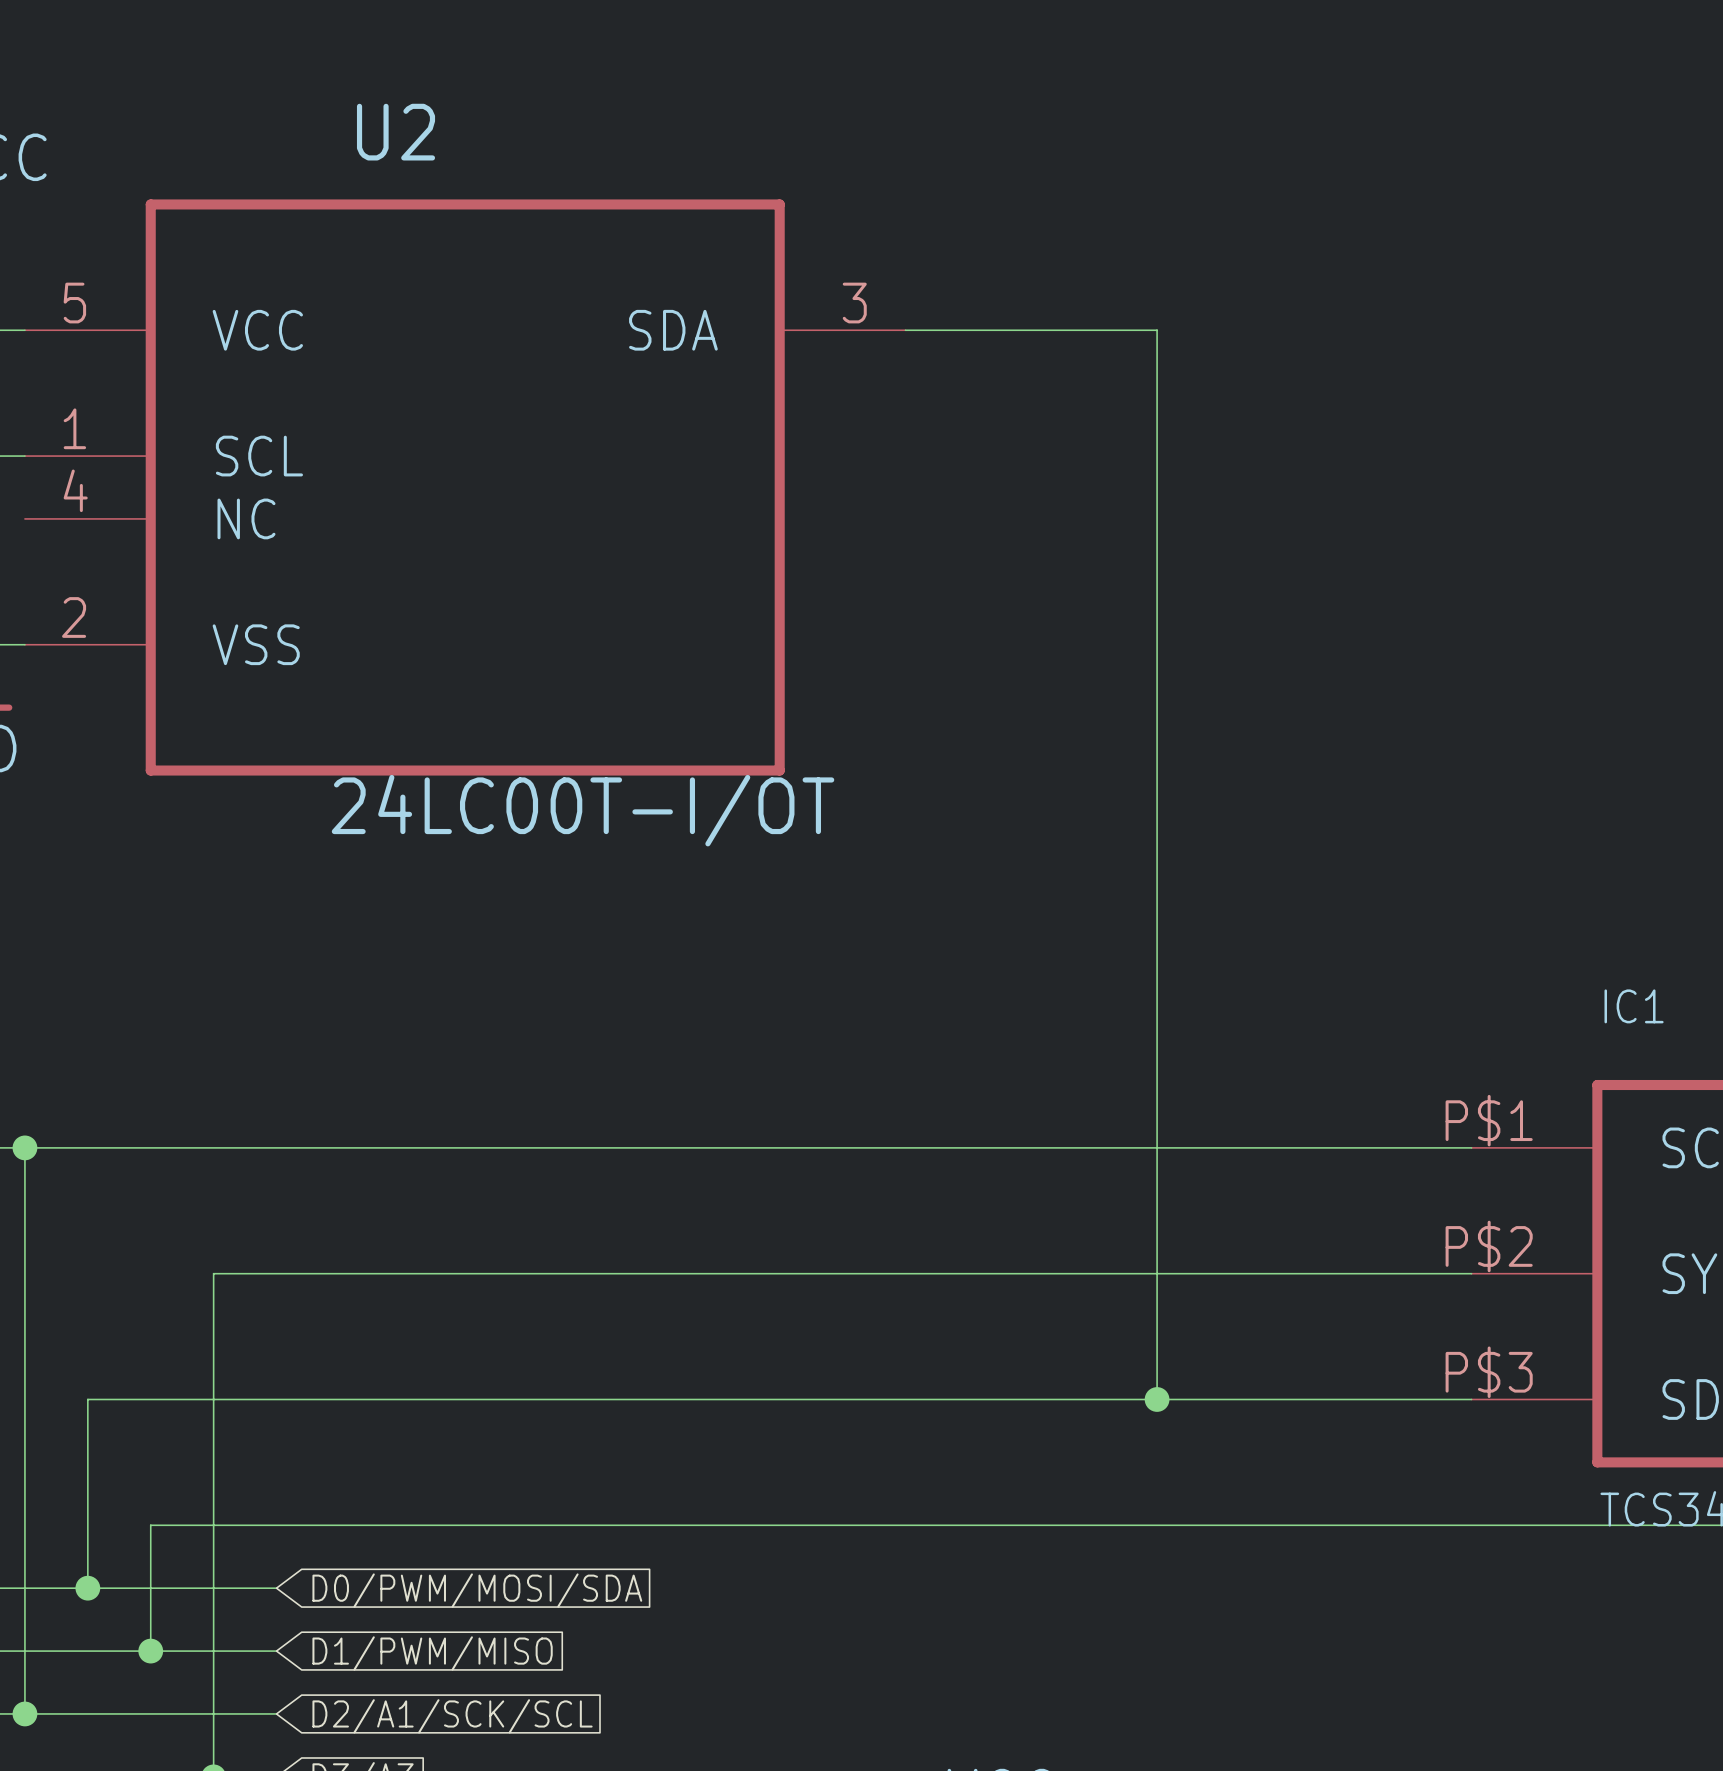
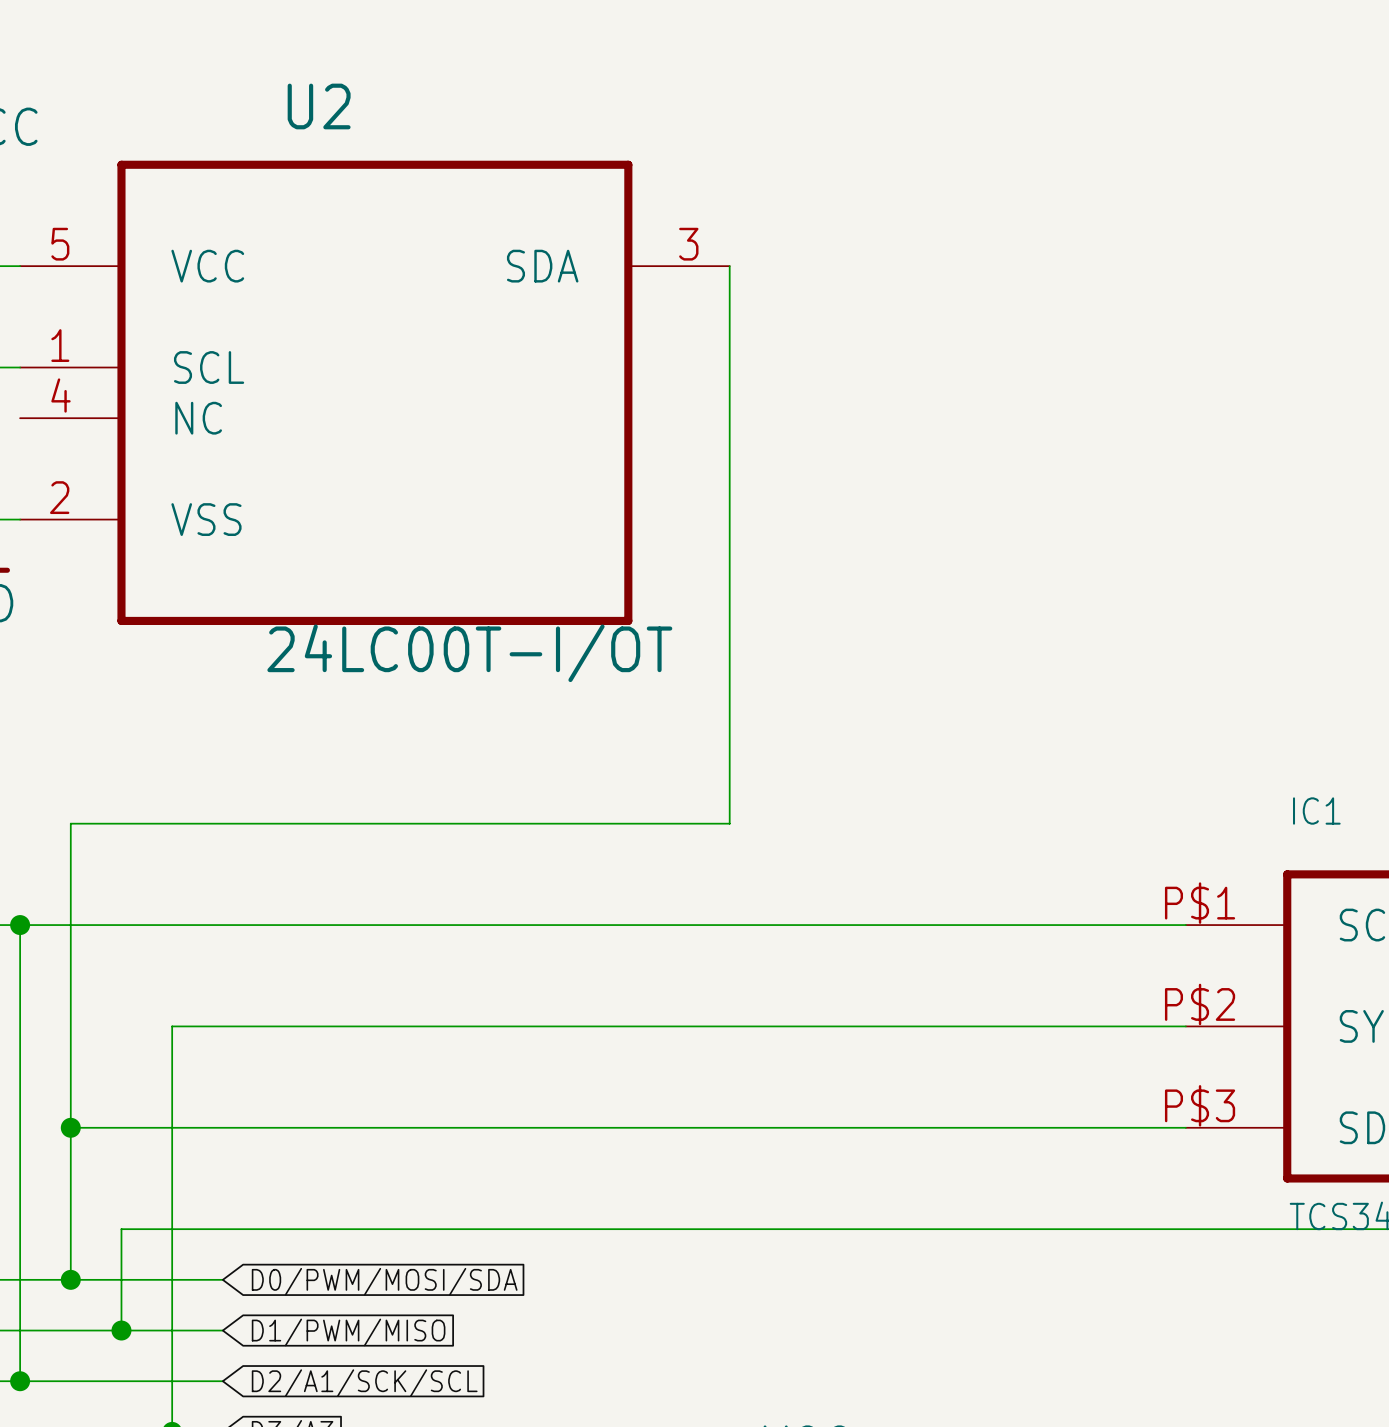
wire: (905, 330) (1157, 330) (1157, 1399) -> (729, 266) (729, 823) (70, 823) (70, 1127)
junction: none -> (70, 1127)
junction: (1157, 1399) -> none

